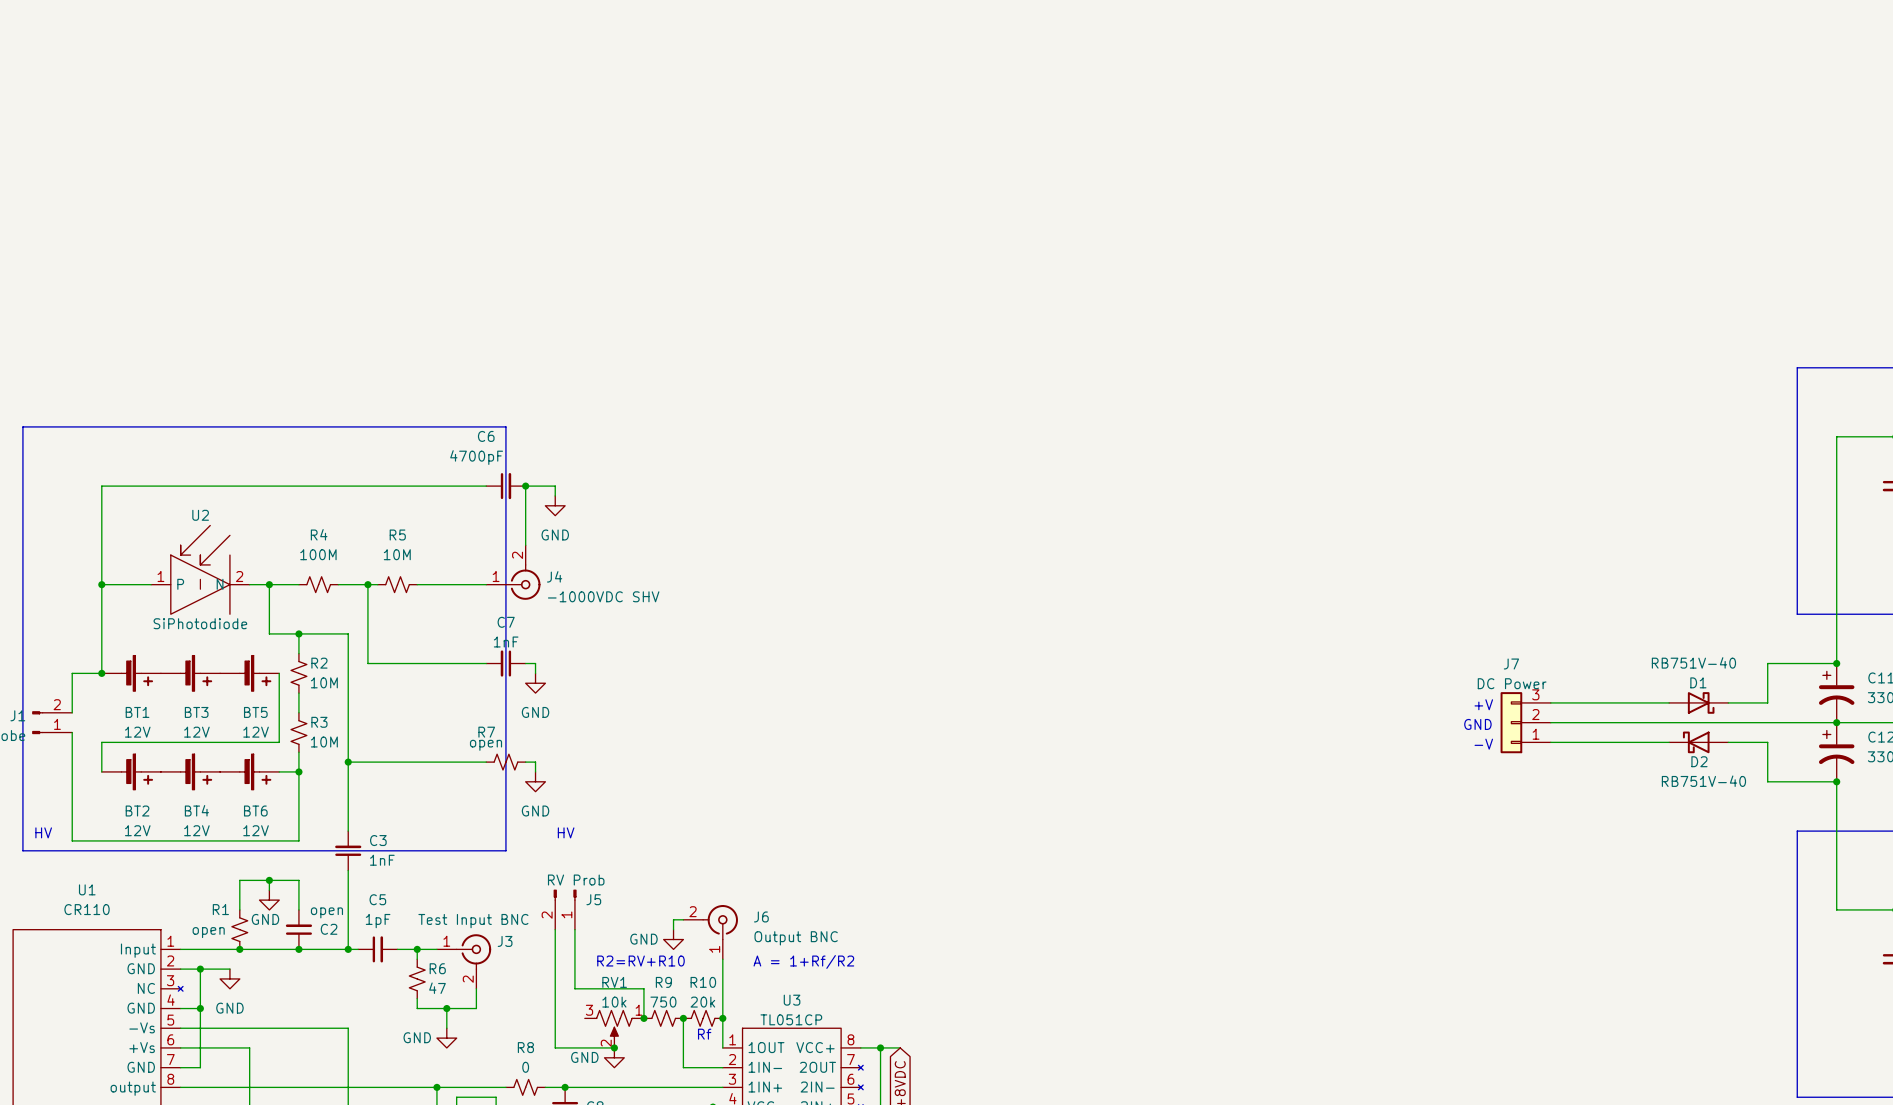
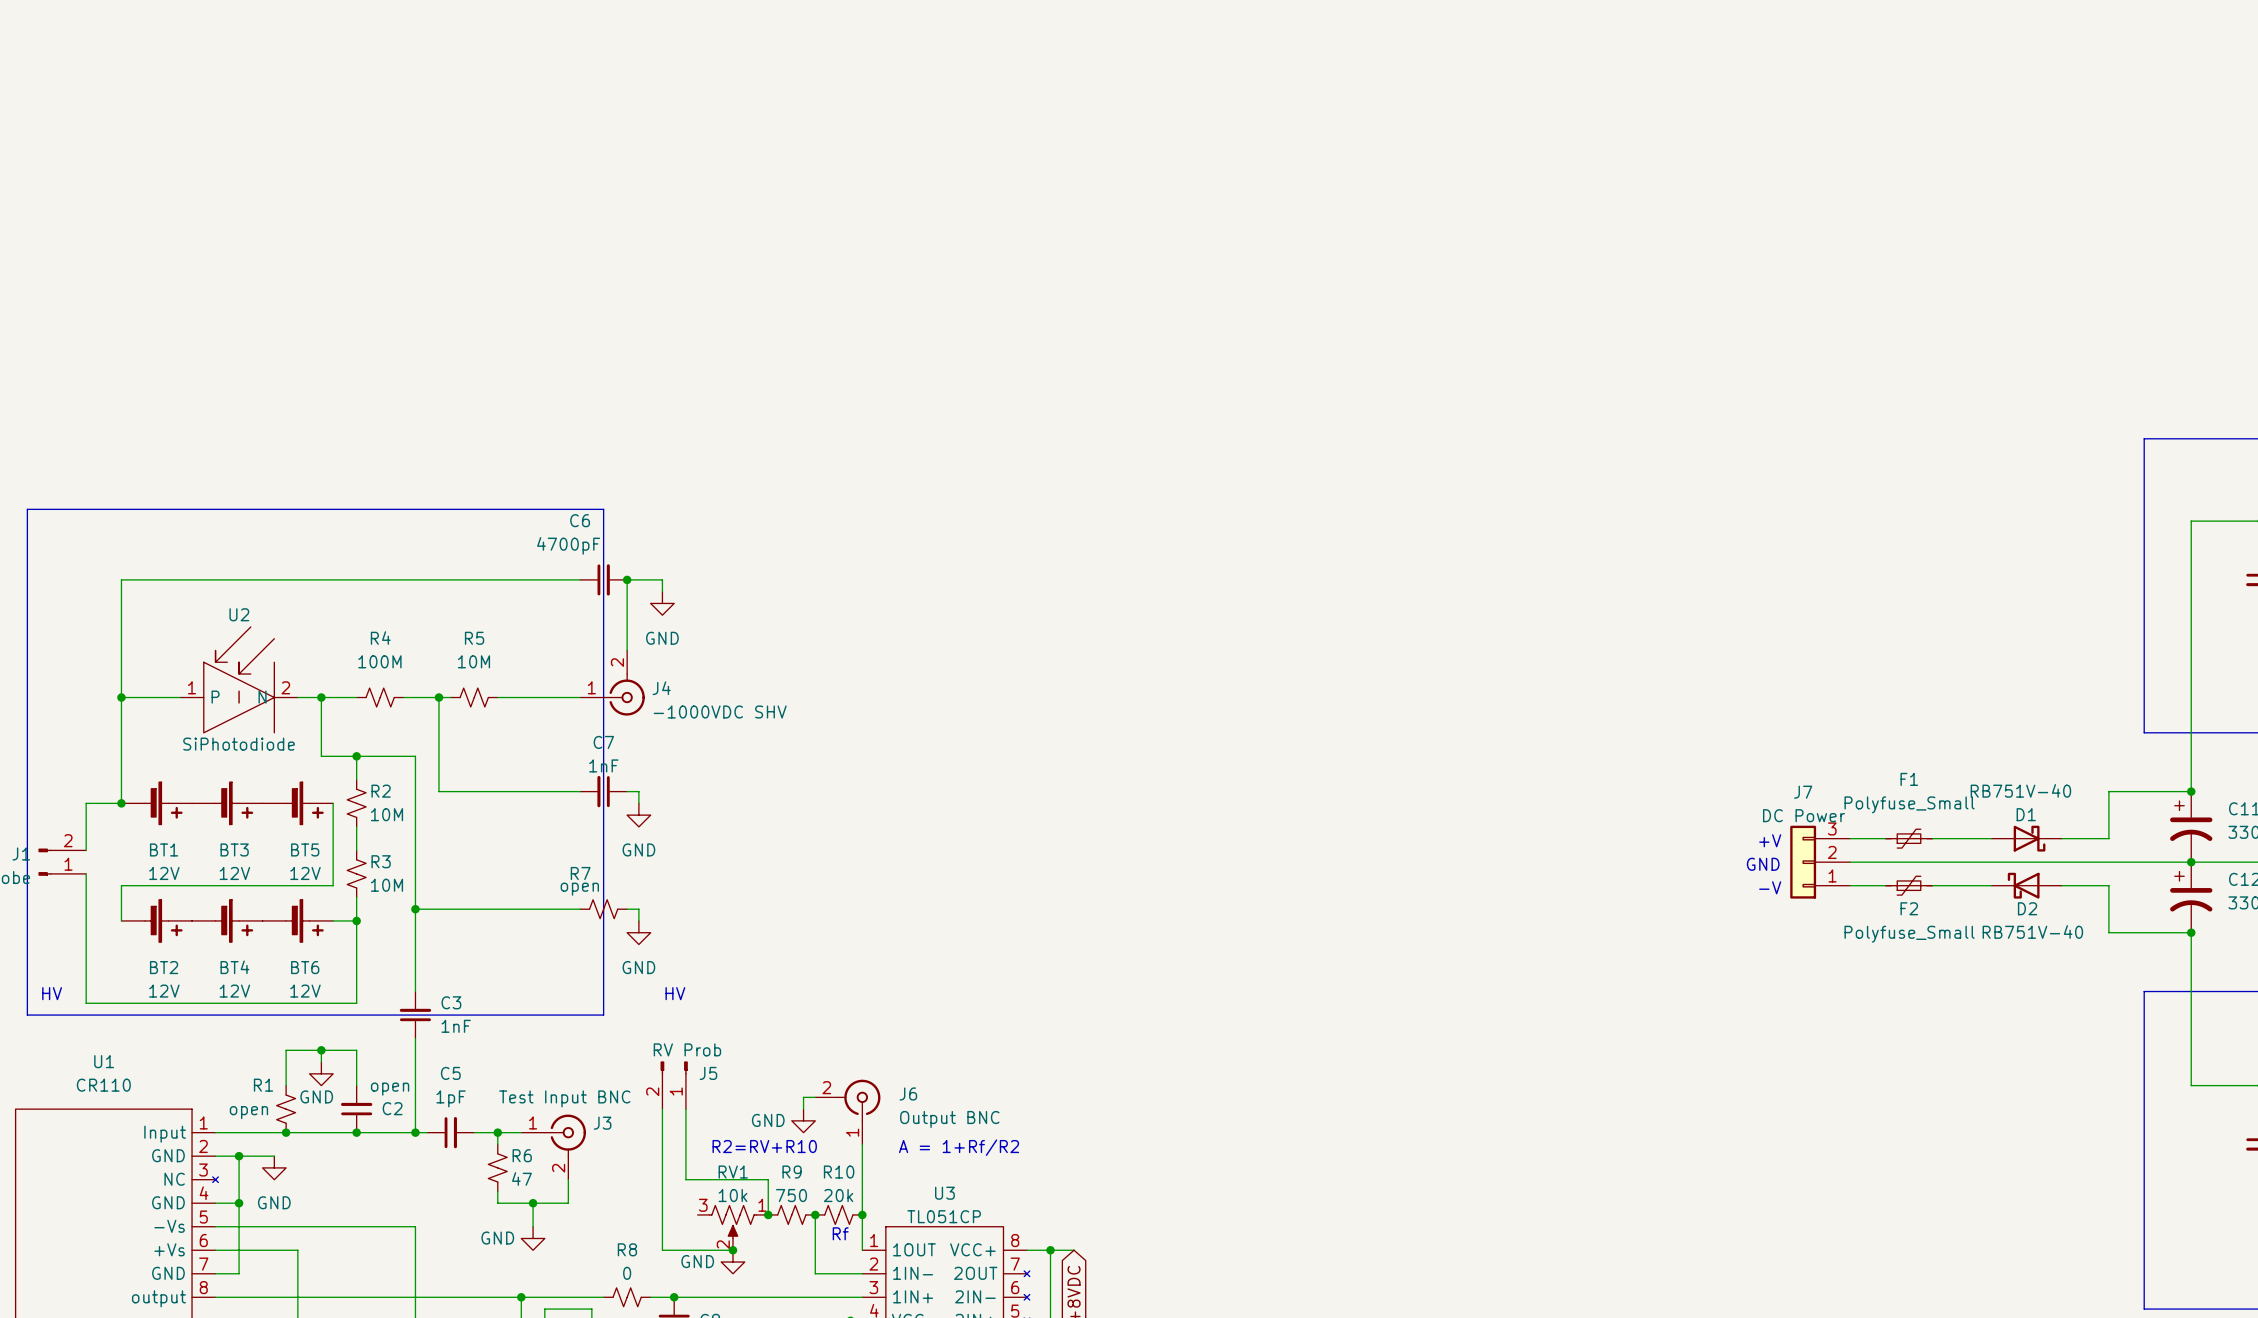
F1: none -> Polyfuse_Small (1909, 838)
F2: none -> Polyfuse_Small (1909, 885)

